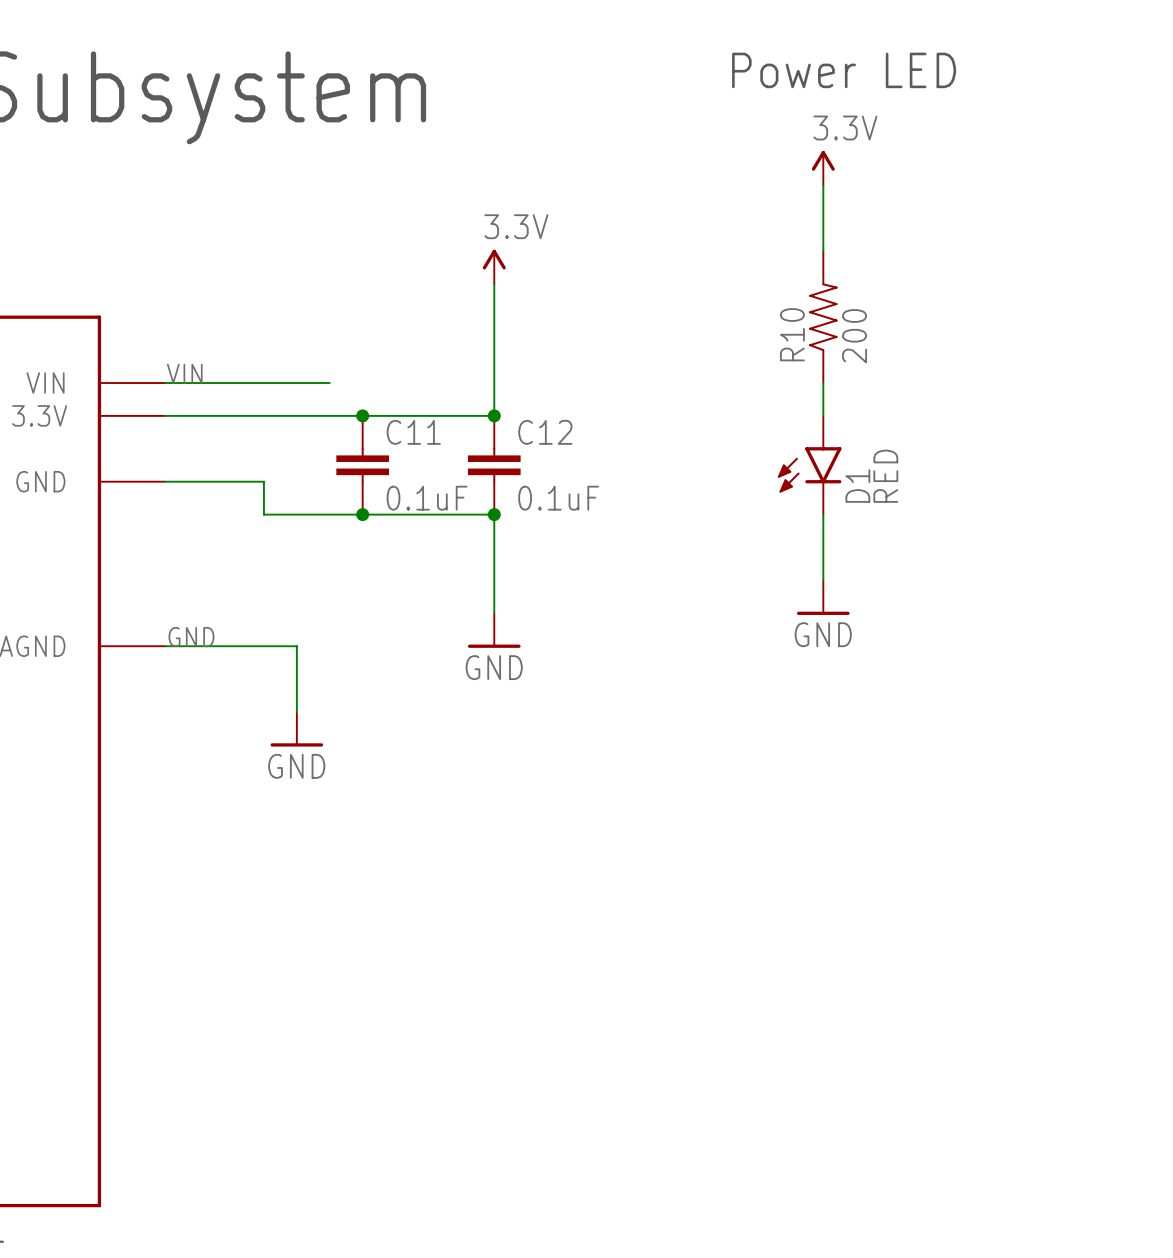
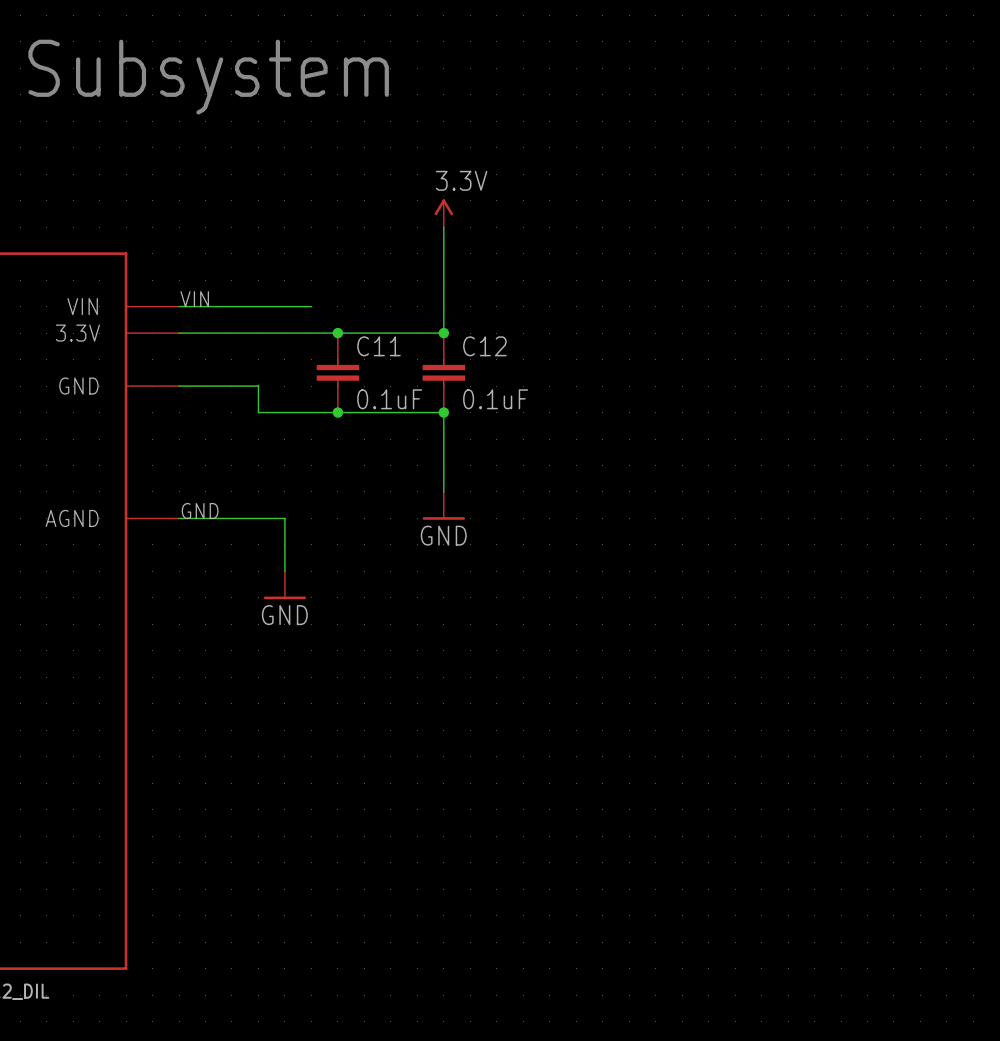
text: Power LED (844, 70) -> none
power symbol: 3.3V (823, 168) -> none
wire: (823, 185) (823, 251) -> none
R10: 200 (823, 317) -> none
wire: (823, 383) (823, 415) -> none
D1: RED (809, 465) -> none
wire: (823, 514) (823, 580) -> none
power symbol: GND (823, 597) -> none

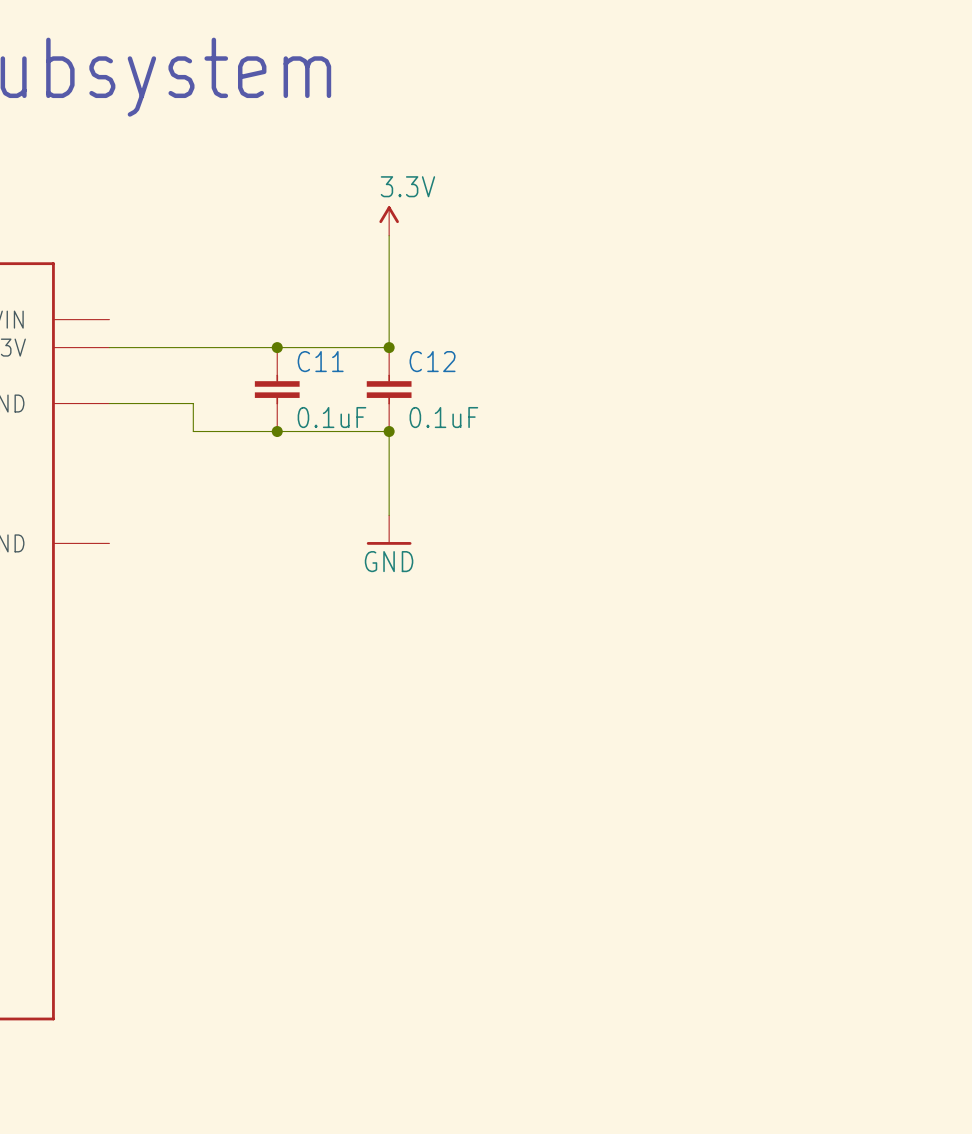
label: VIN (194, 299) -> none
wire: (179, 306) (311, 306) -> none
label: GND (200, 511) -> none
wire: (179, 518) (284, 518) (284, 571) -> none
power symbol: GND (284, 585) -> none

